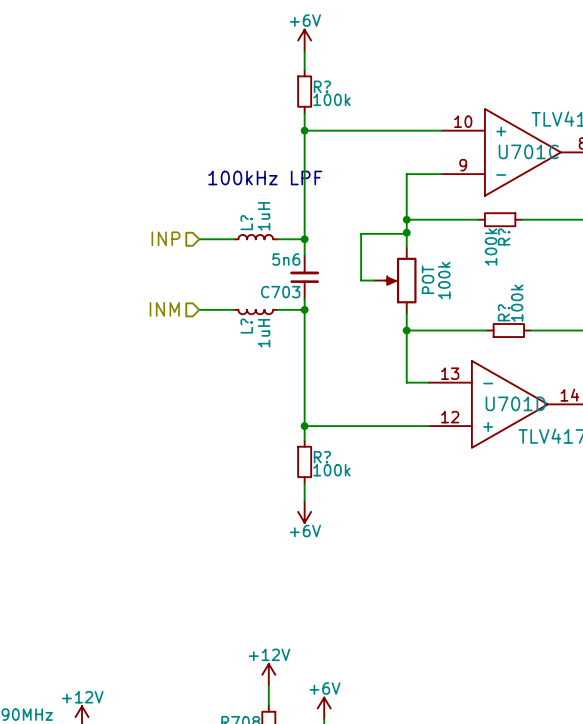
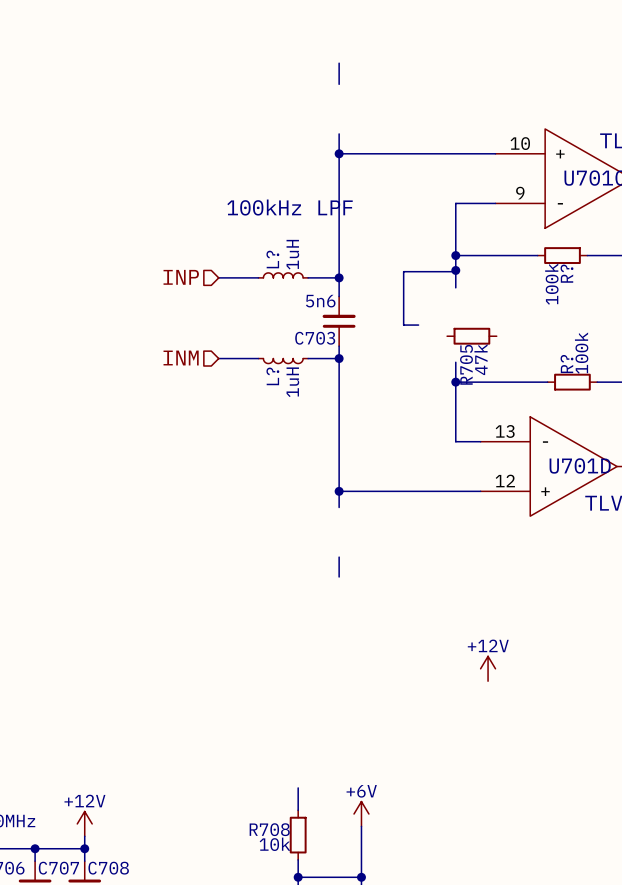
power symbol: +6V (304, 40) -> none
R?: 100k (304, 91) -> none
100k: POT (395, 280) -> none
R705: none -> 47k (471, 336)
R?: 100k (304, 461) -> none
power symbol: +6V (304, 511) -> none
power symbol position: +12V (268, 674) -> +12V (488, 668)

